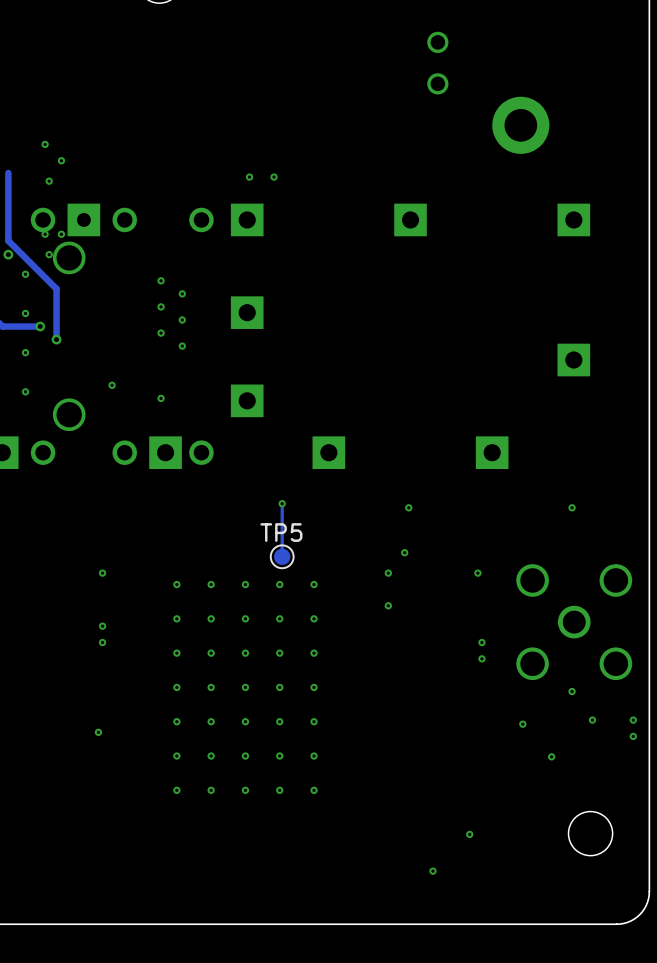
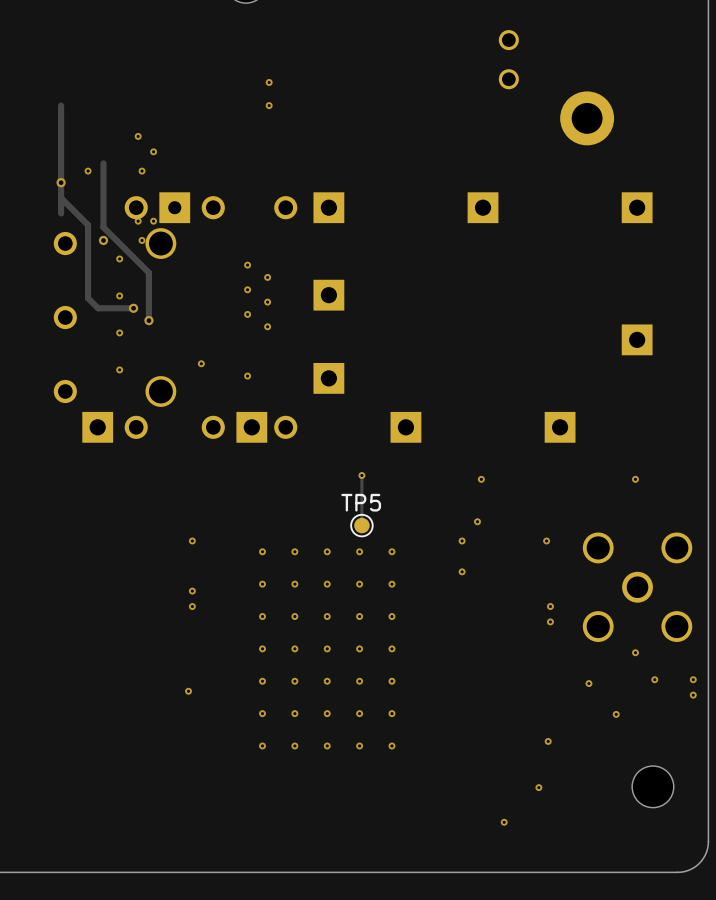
via: none -> (269, 82)
via: none -> (269, 105)
via: (249, 177) -> none
via: (274, 177) -> none
via: none -> (548, 741)

